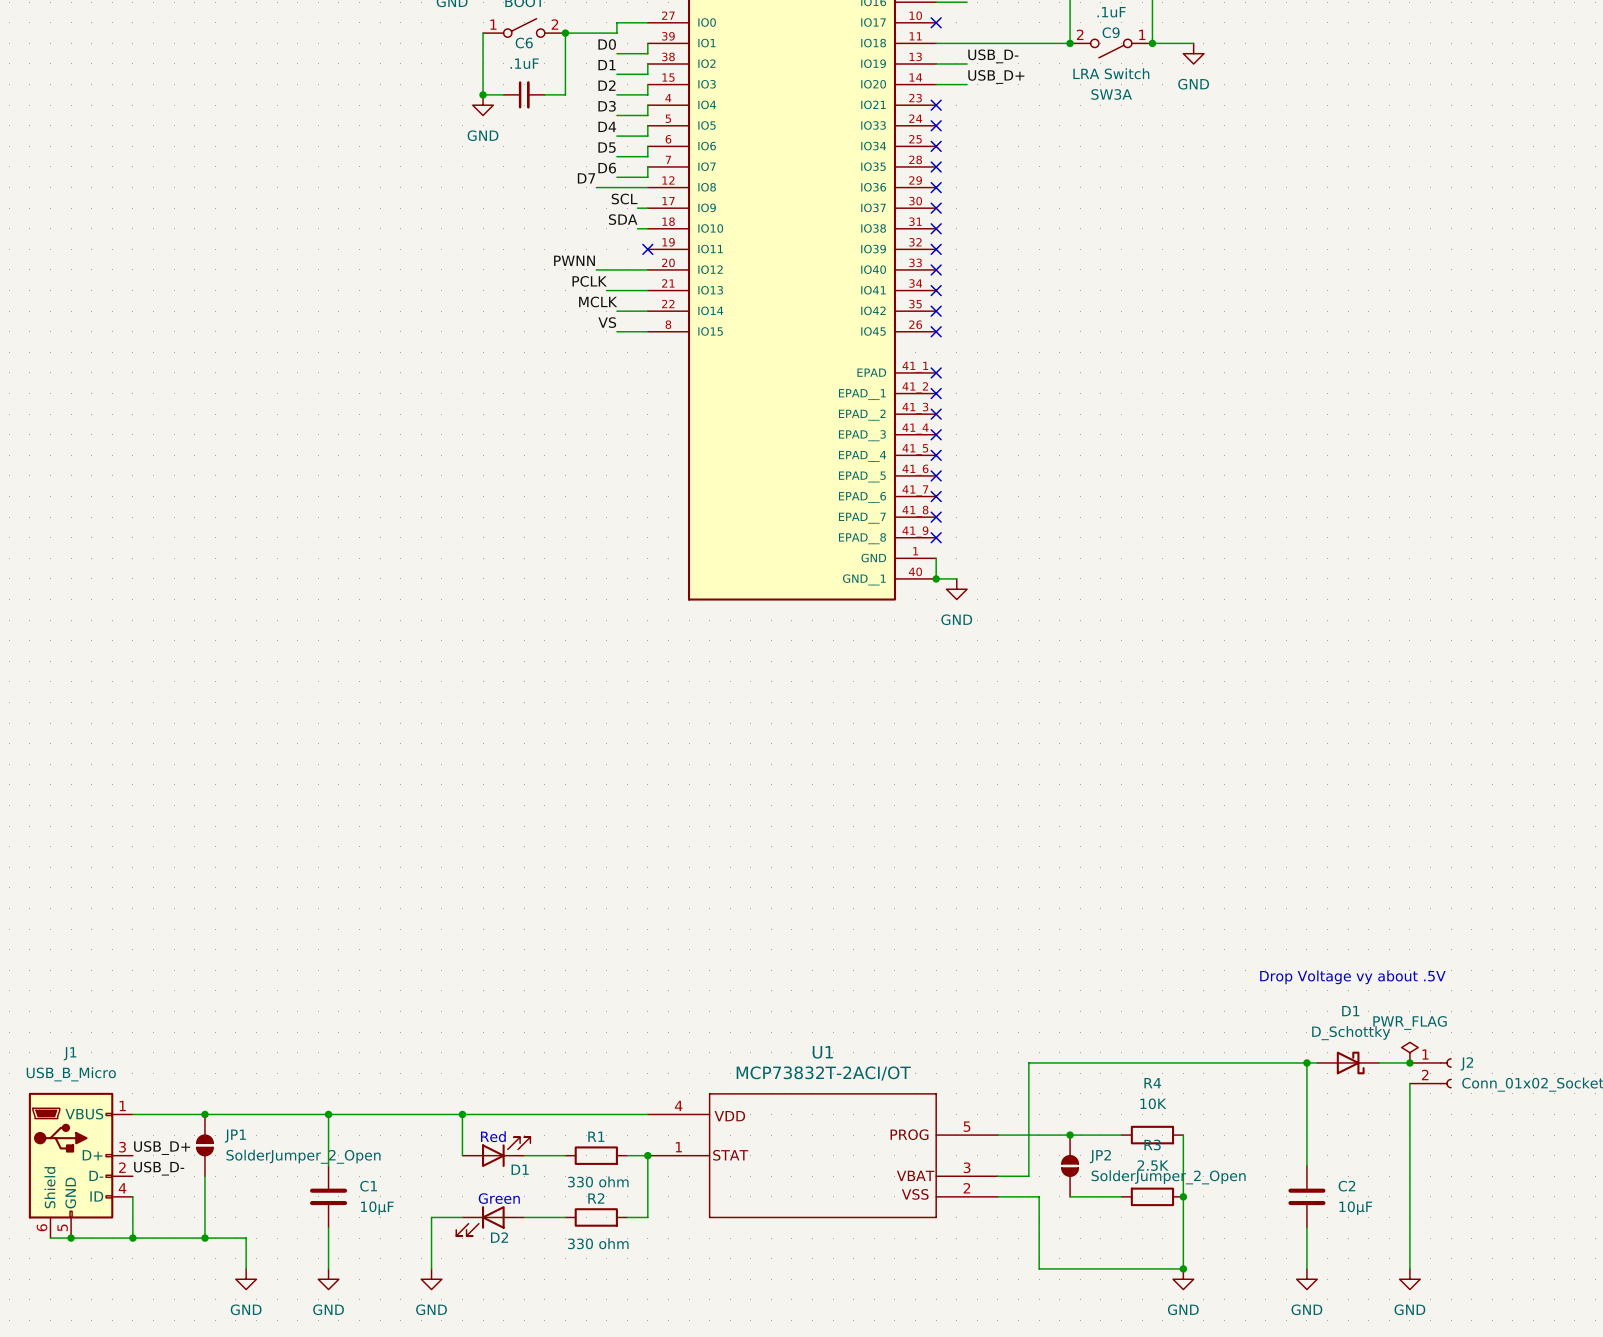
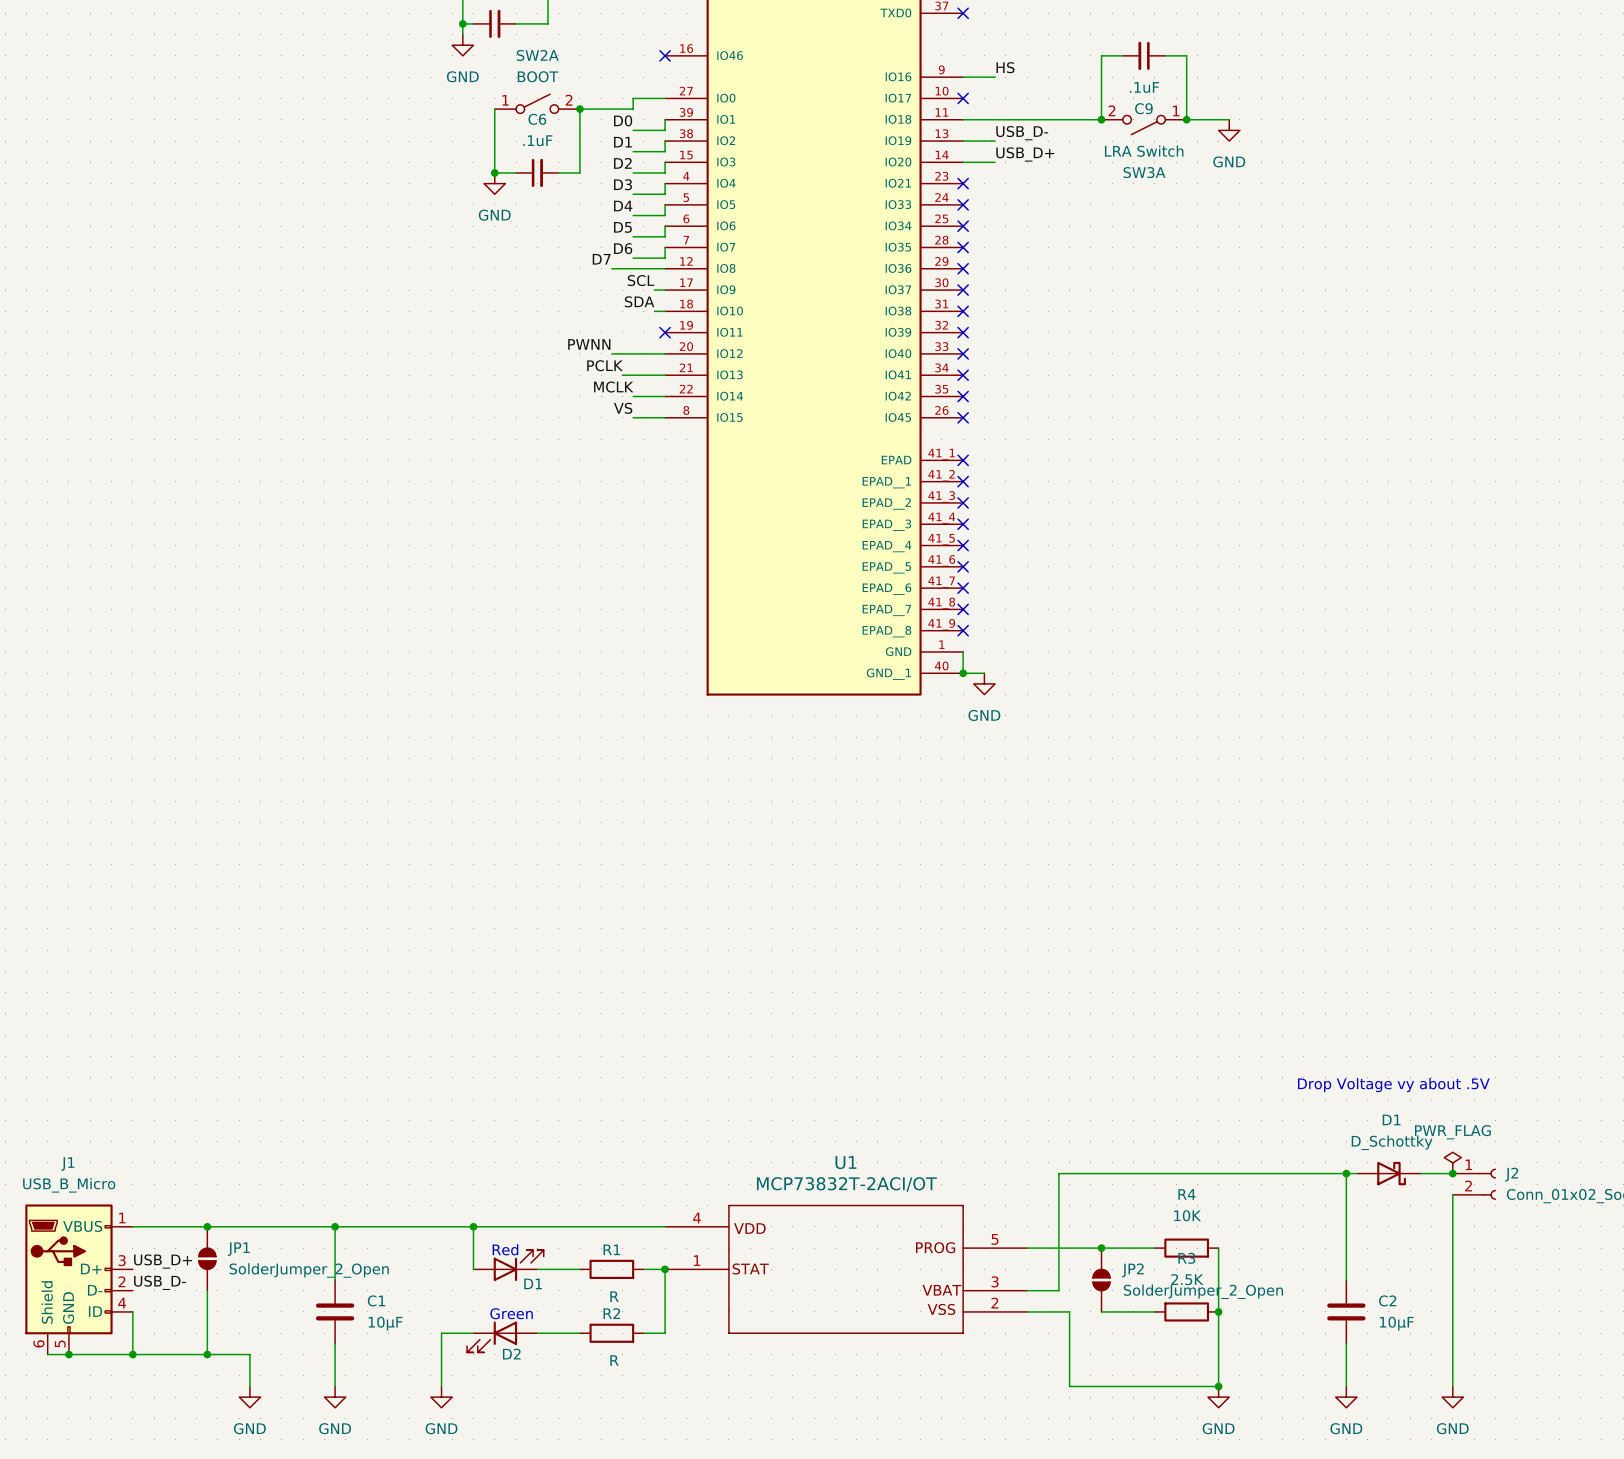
R1 value: 330 ohm (598, 1181) -> R (614, 1296)
R2 value: 330 ohm (598, 1243) -> R (614, 1360)

